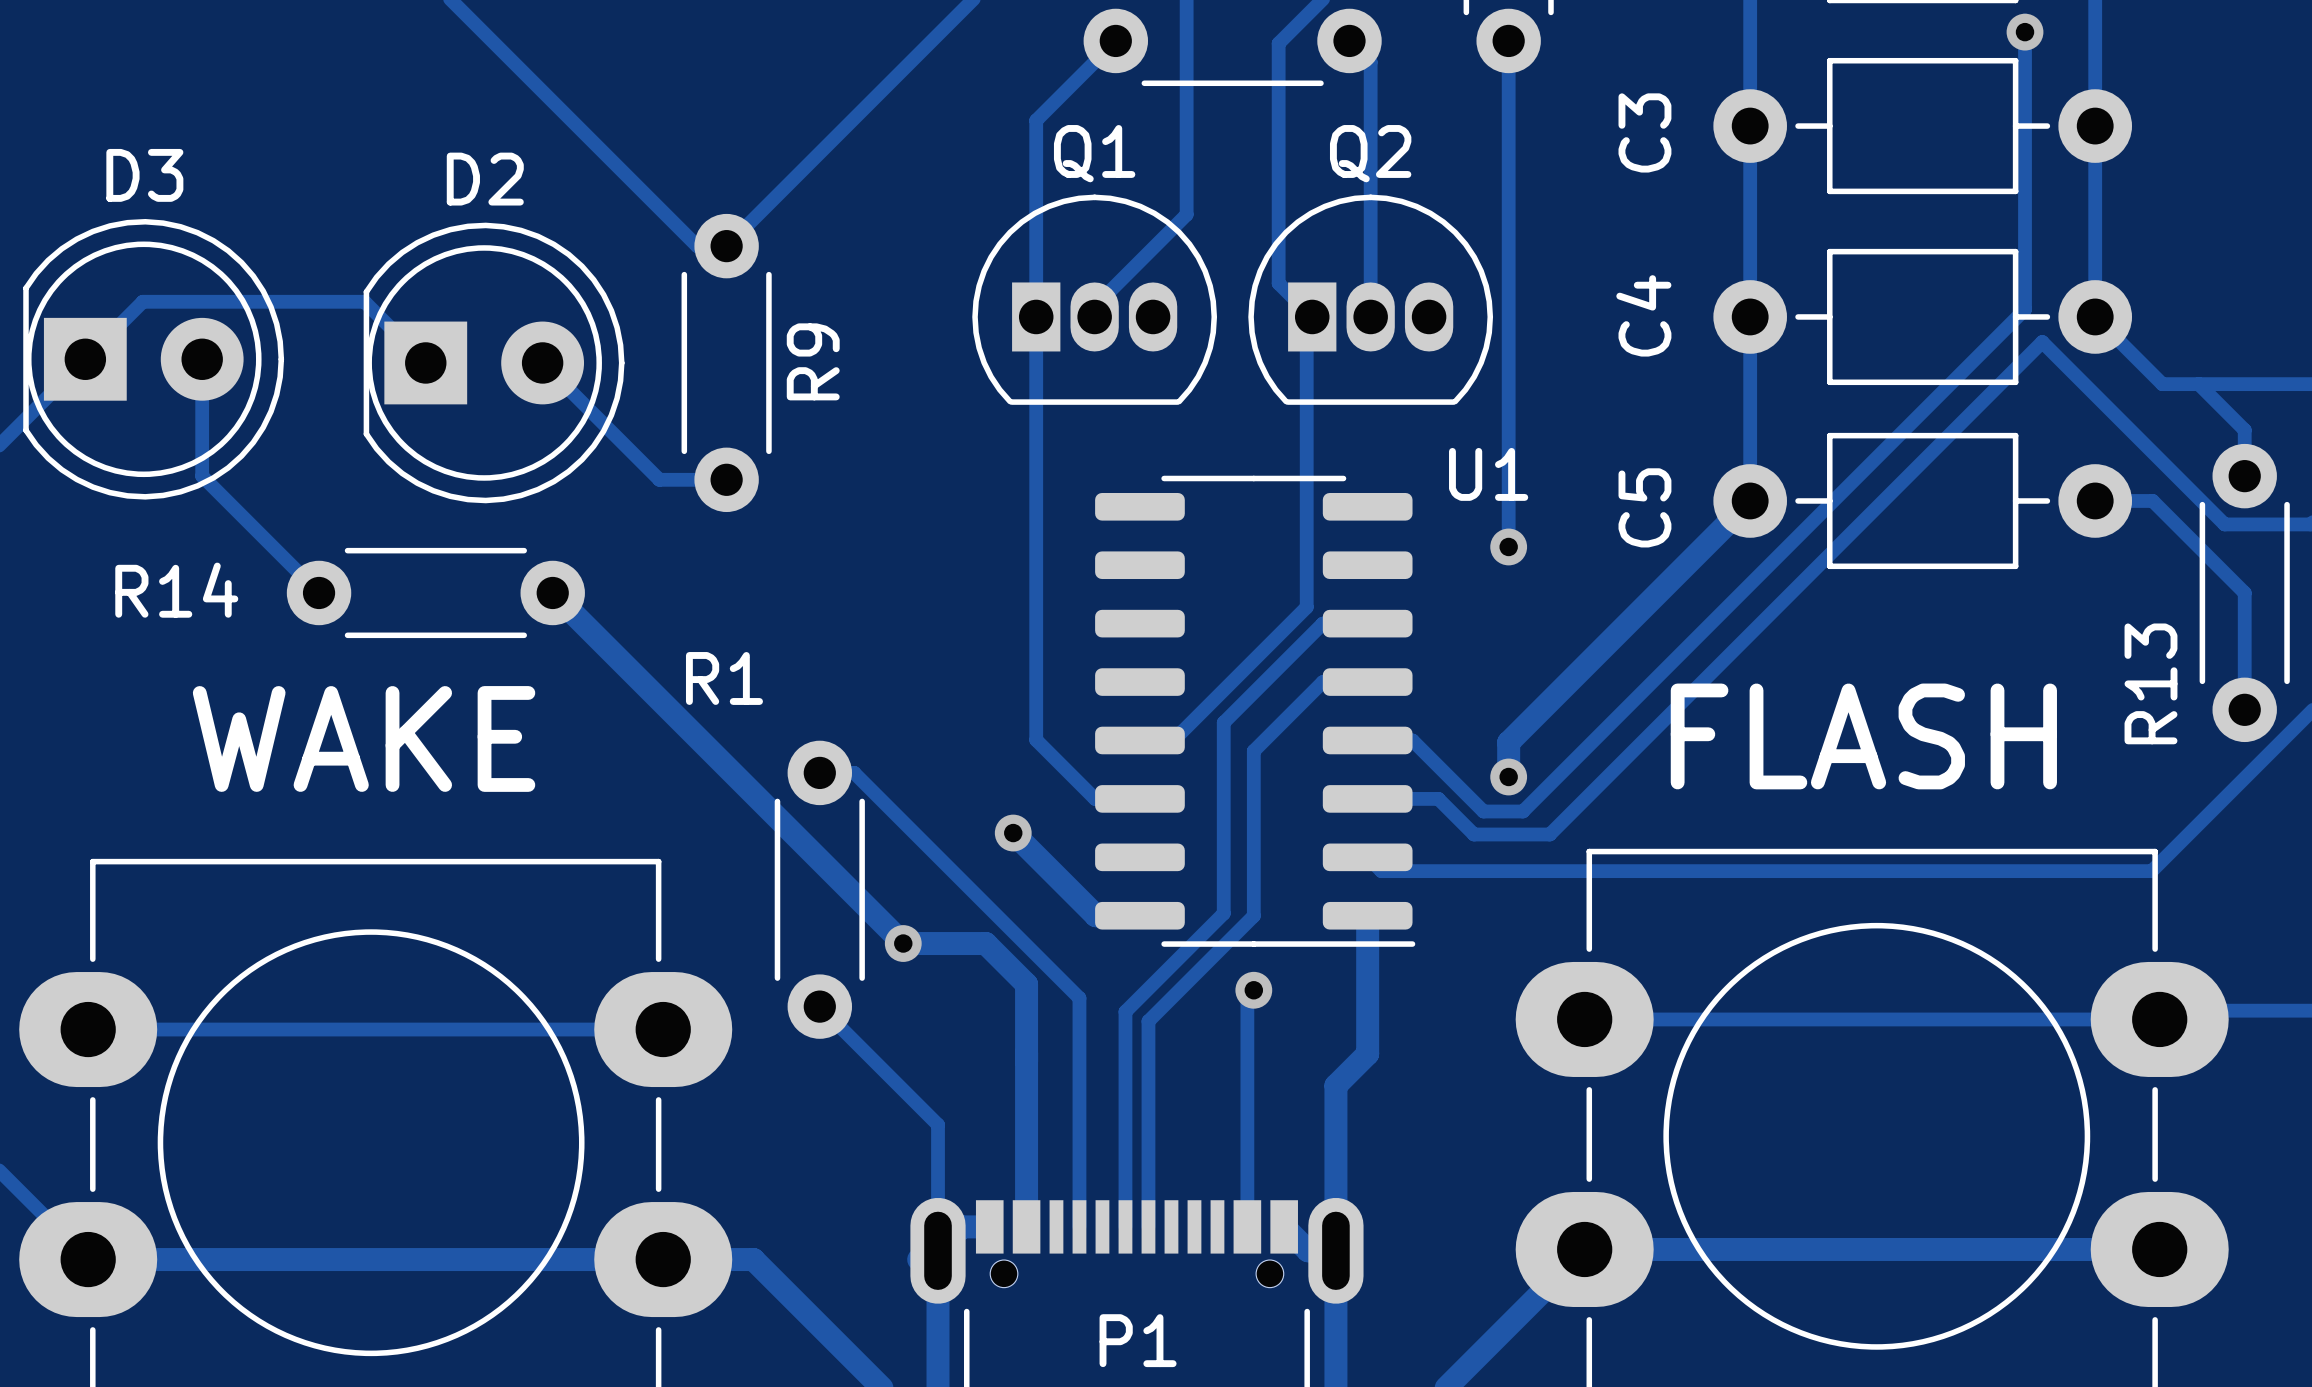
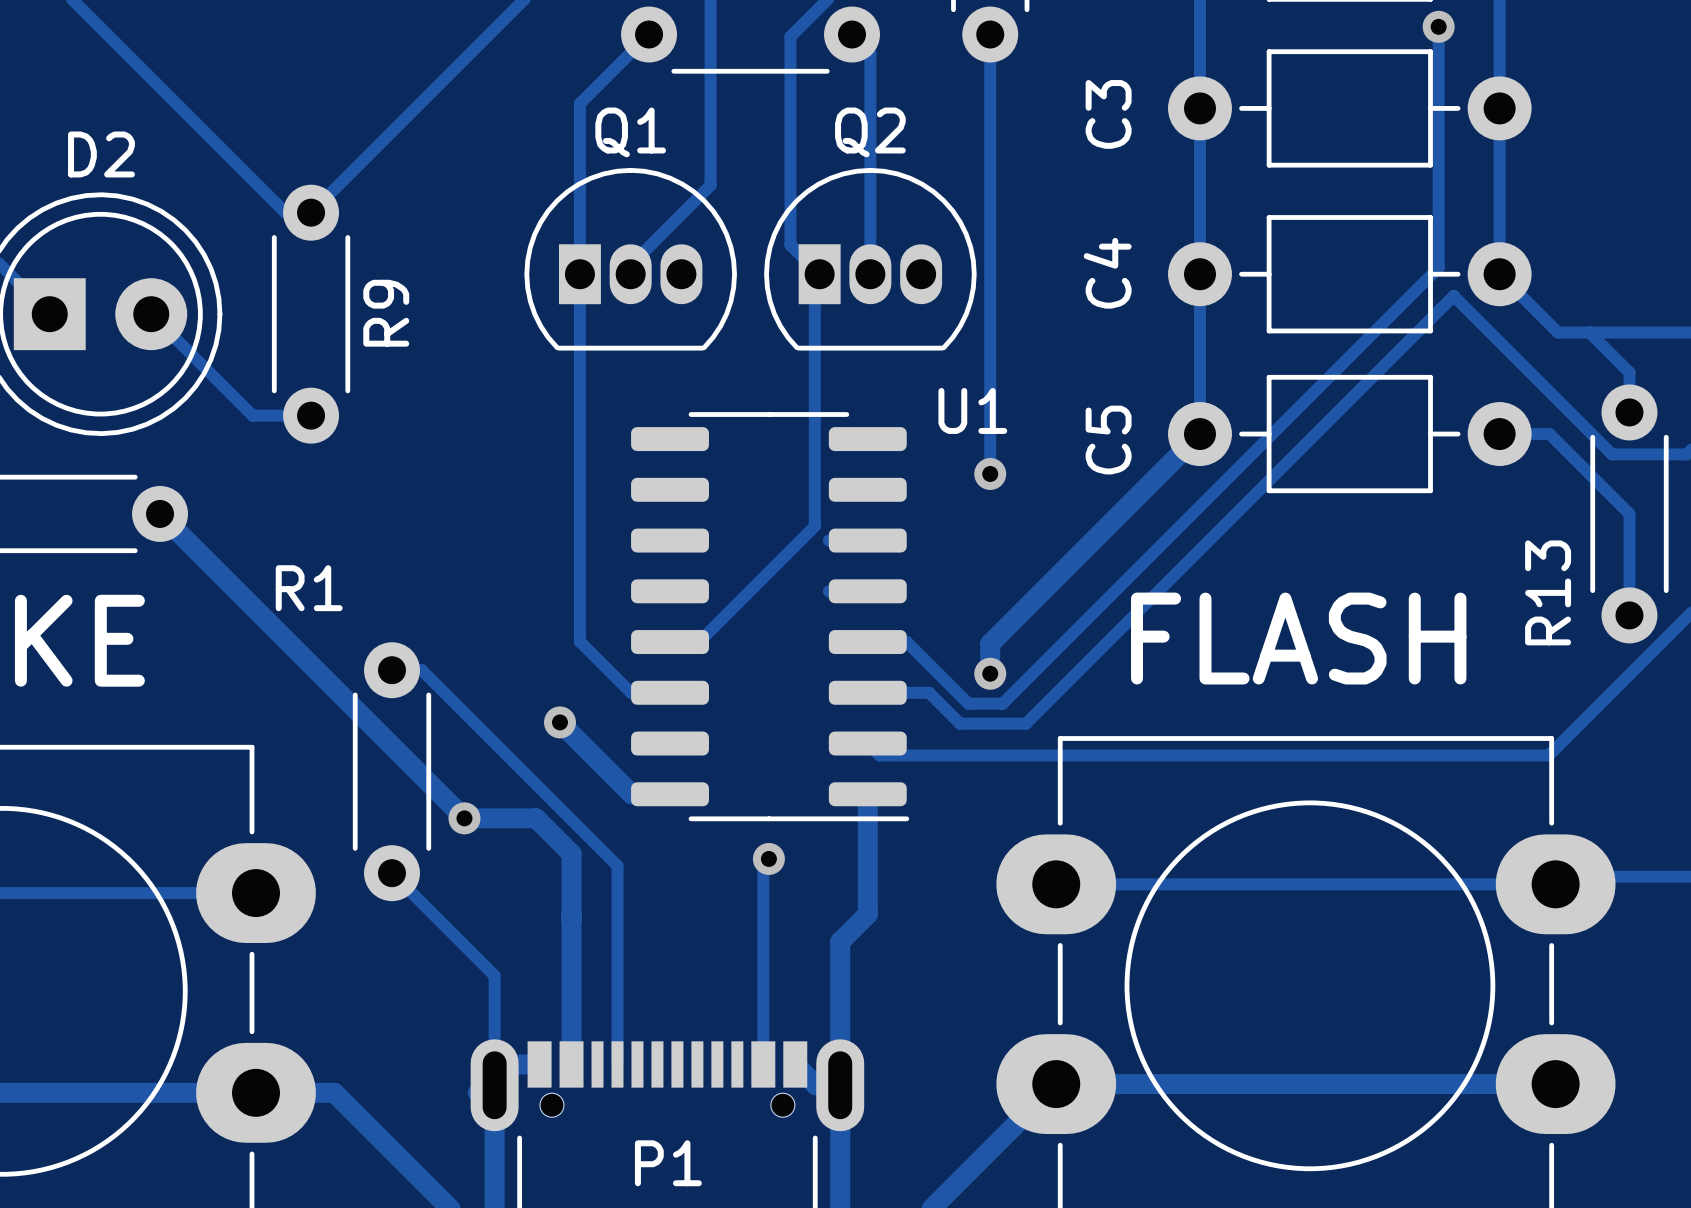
track: (1322, 623) (1223, 722) (1223, 913) (1125, 1011) (1125, 1226) -> none
track: (1322, 682) (1253, 751) (1253, 915) (1148, 1021) (1148, 1226) -> none

